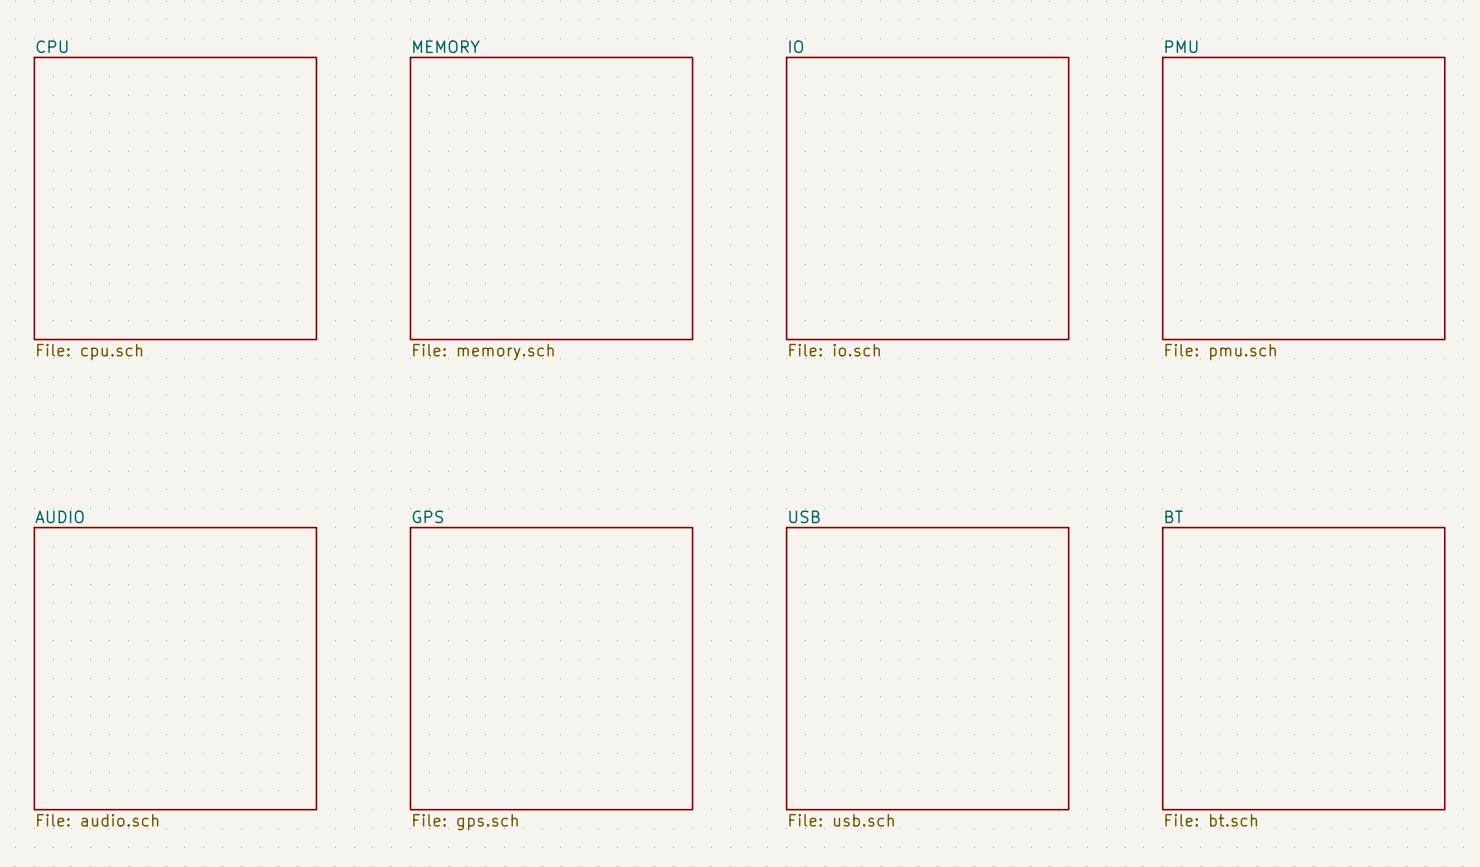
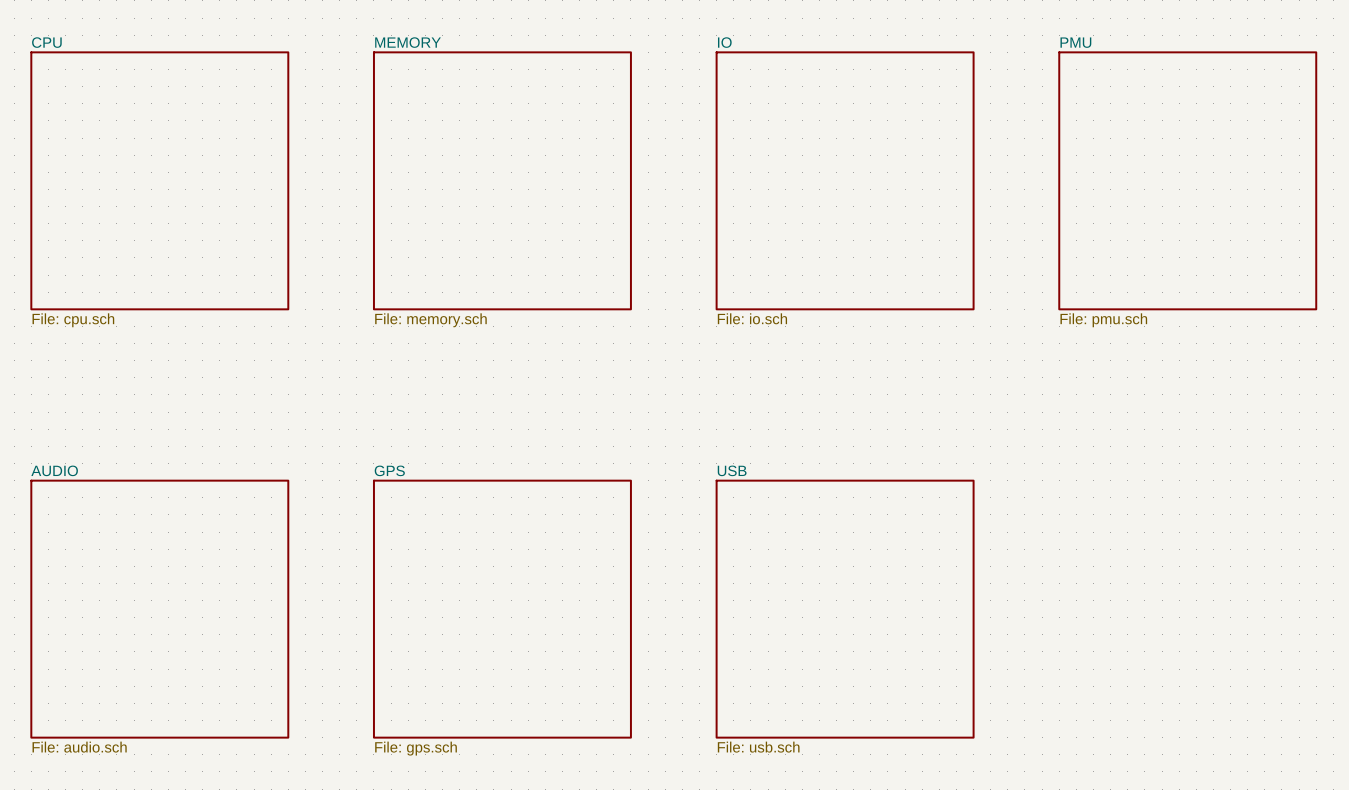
sheet BT: File: bt.sch (1303, 668) -> none

